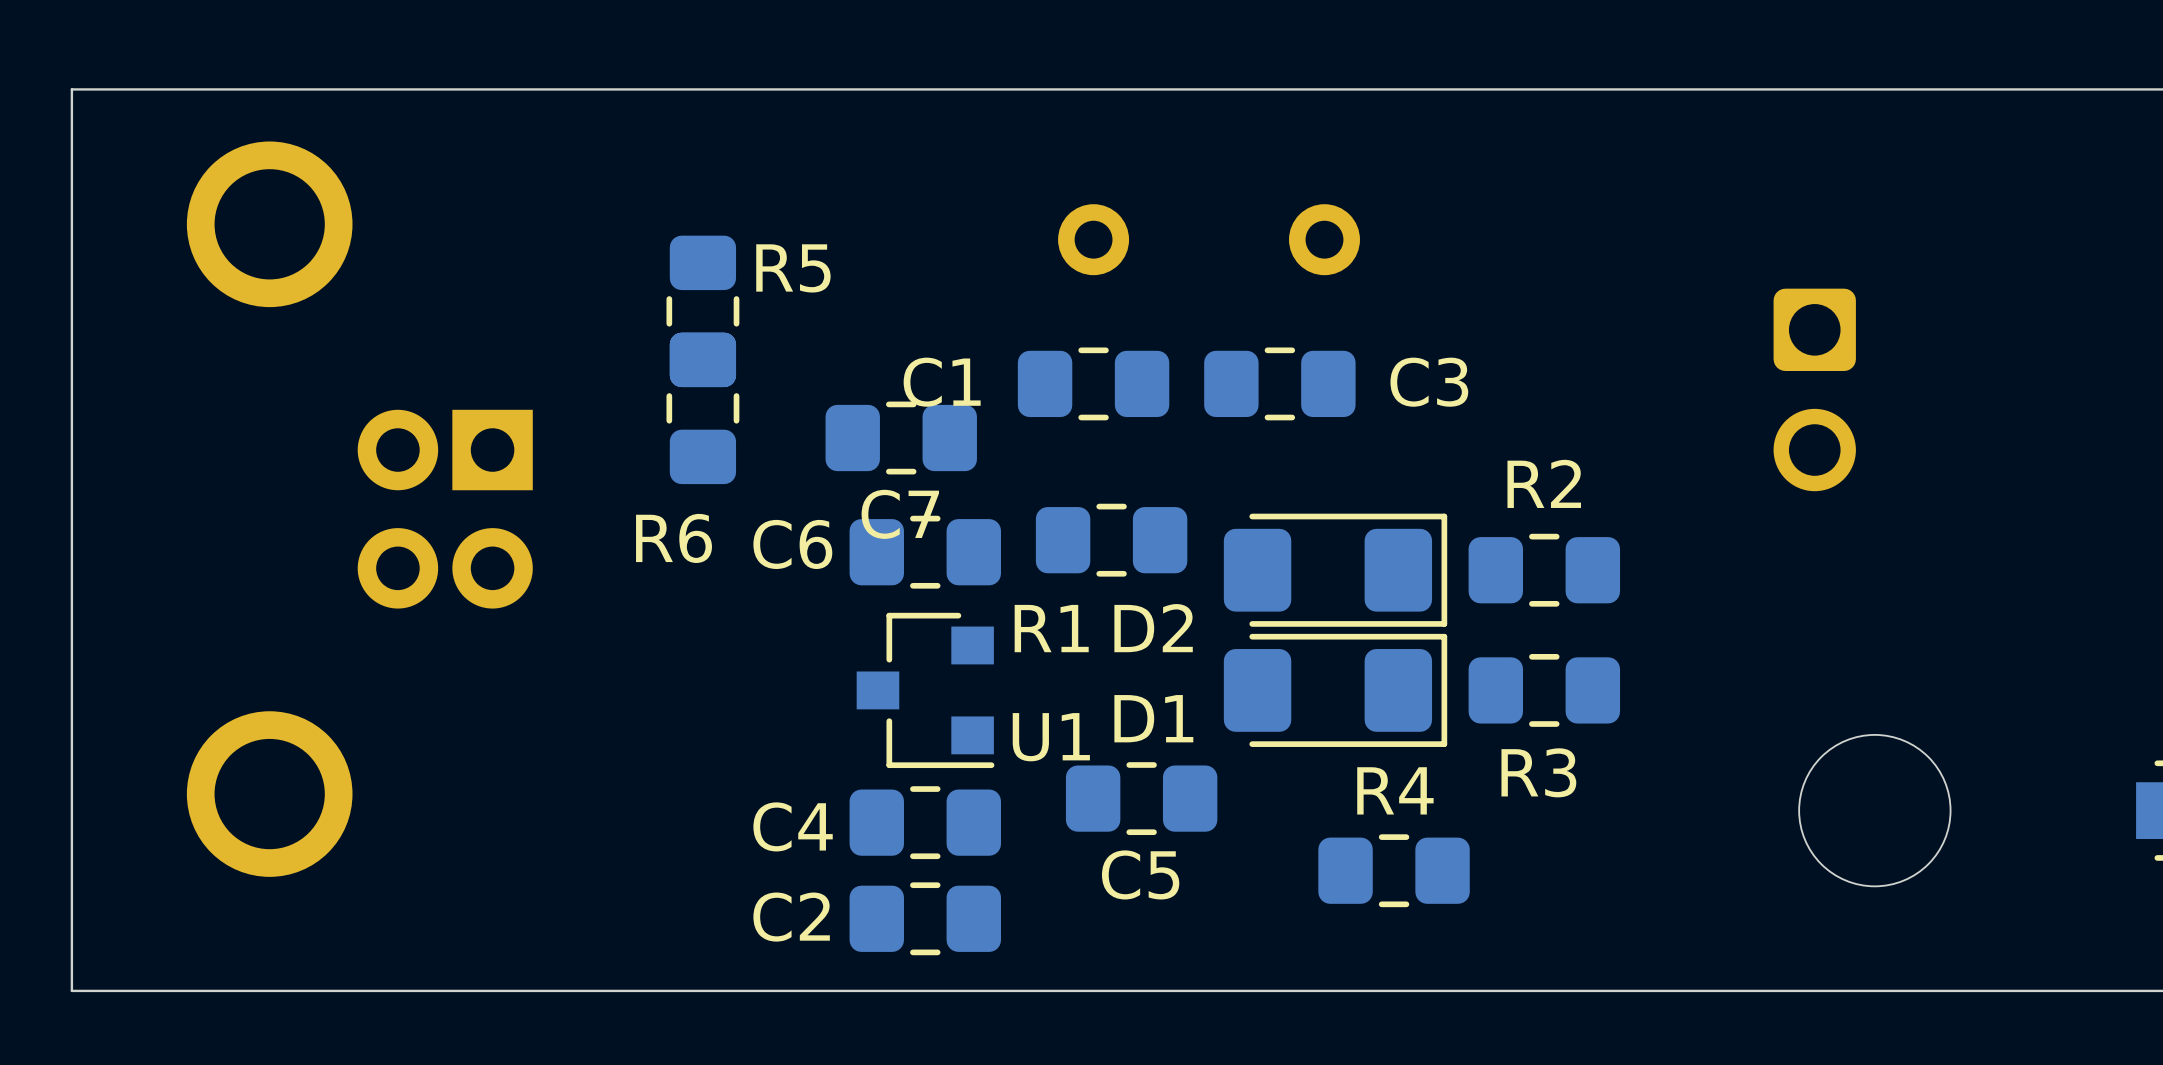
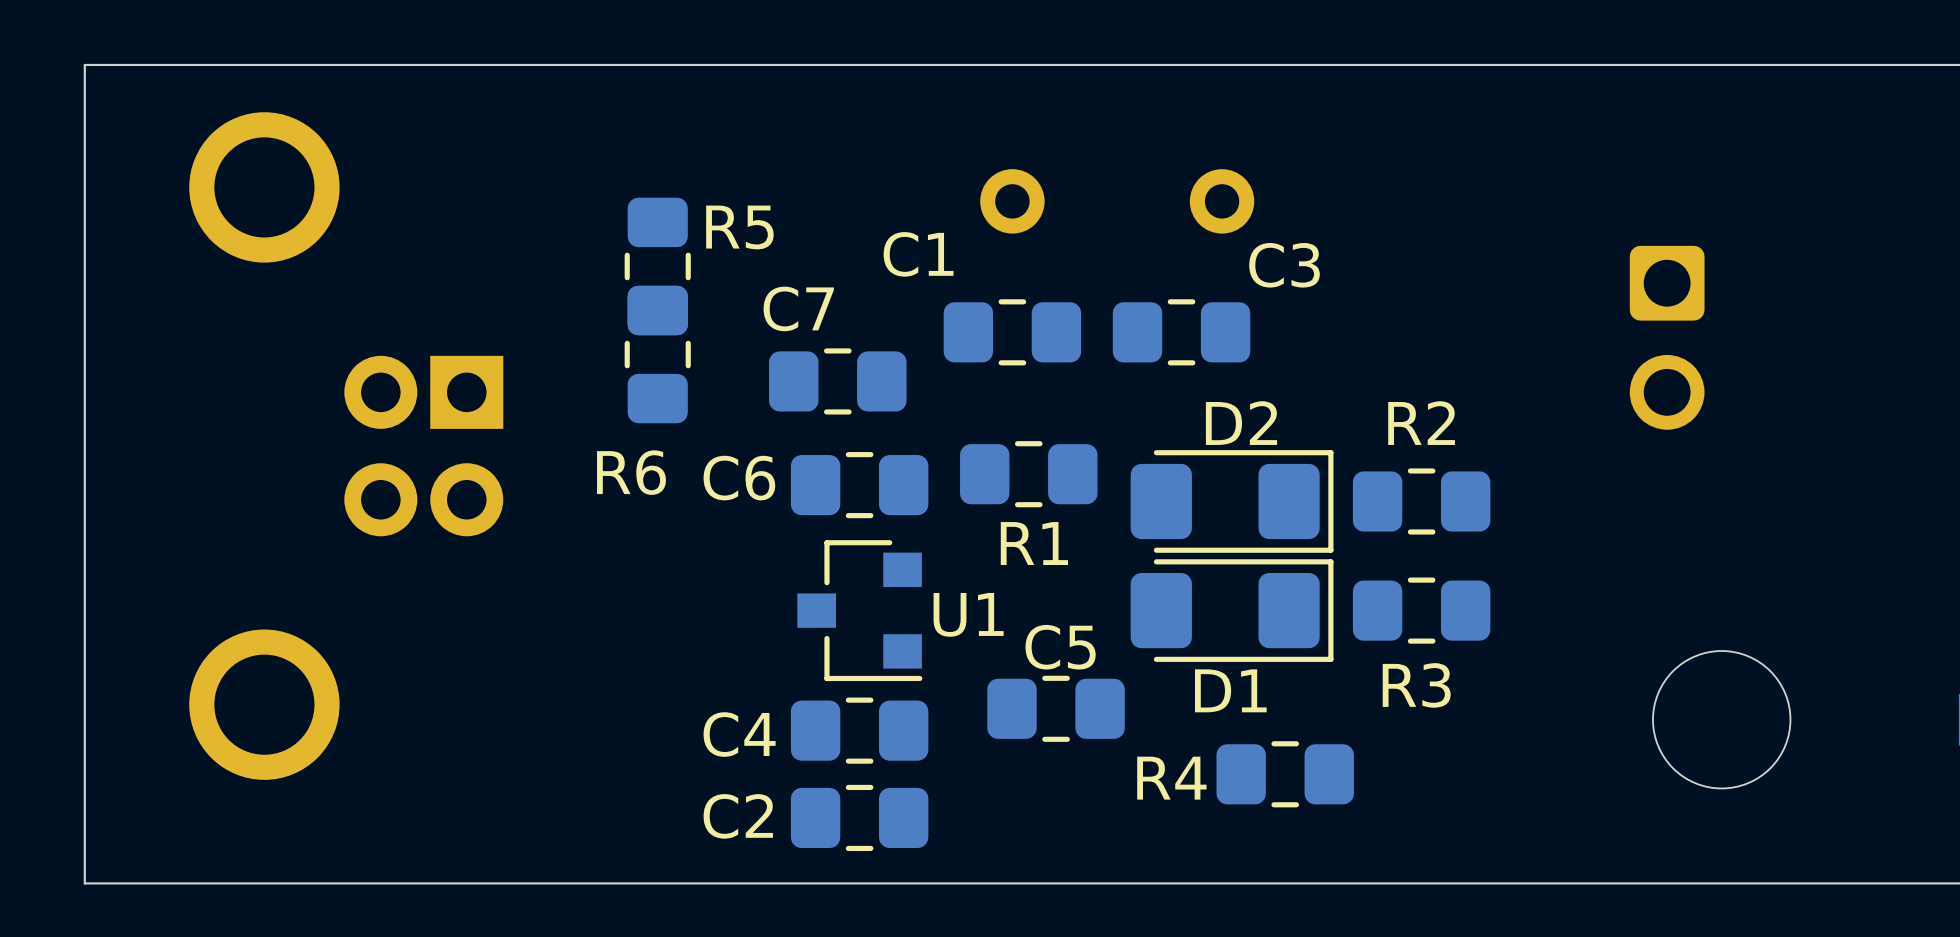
C1 name position: C1 (942, 382) -> C1 (918, 254)
C3 name position: C3 (1429, 382) -> C3 (1284, 265)
C7 name position: C7 (900, 514) -> C7 (798, 308)
R1 name position: R1 (1051, 628) -> R1 (1034, 543)
D2 name position: D2 (1153, 628) -> D2 (1241, 423)
D1 name position: D1 (1153, 718) -> D1 (1230, 690)
U1 name position: U1 (1051, 737) -> U1 (968, 614)
R4 name position: R4 (1395, 790) -> R4 (1171, 778)
C5 name position: C5 (1140, 874) -> C5 (1060, 647)

